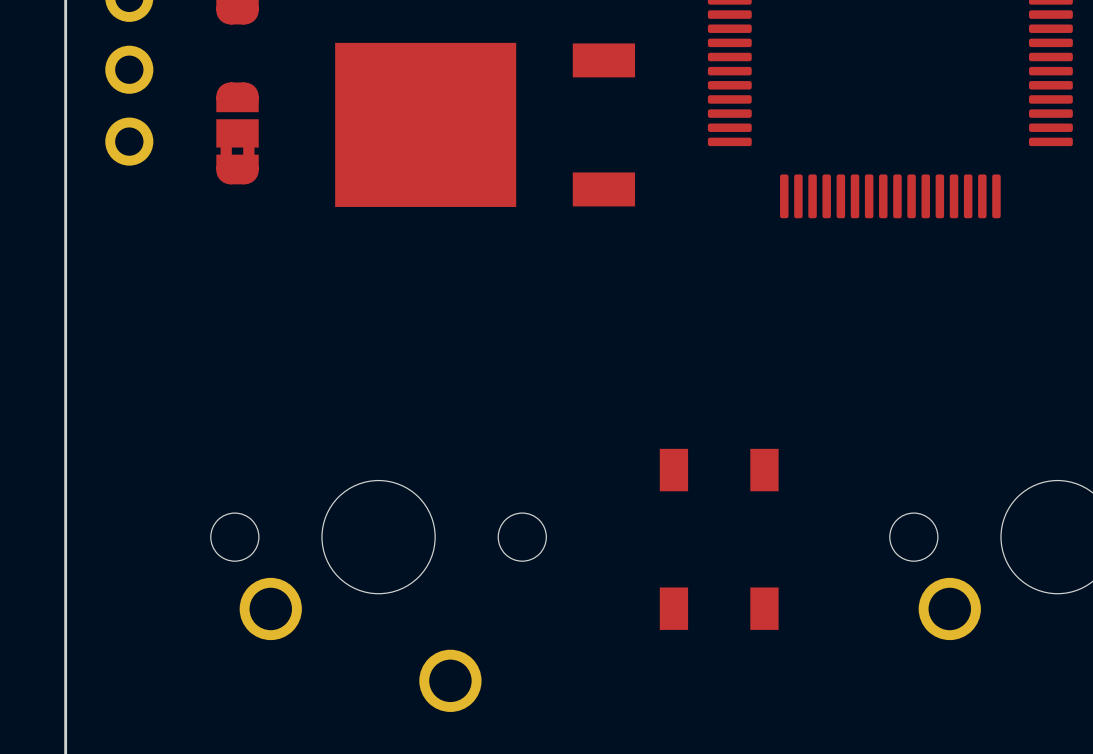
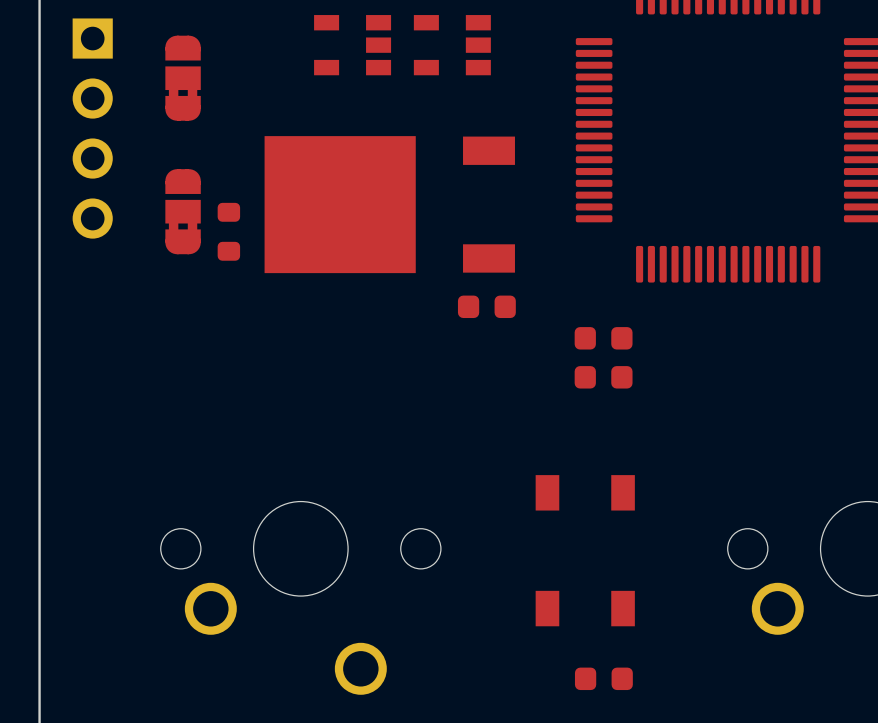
part: none -> (228, 231)
part: none -> (486, 306)
part: none -> (603, 338)
part: none -> (603, 377)
part: none -> (603, 678)

